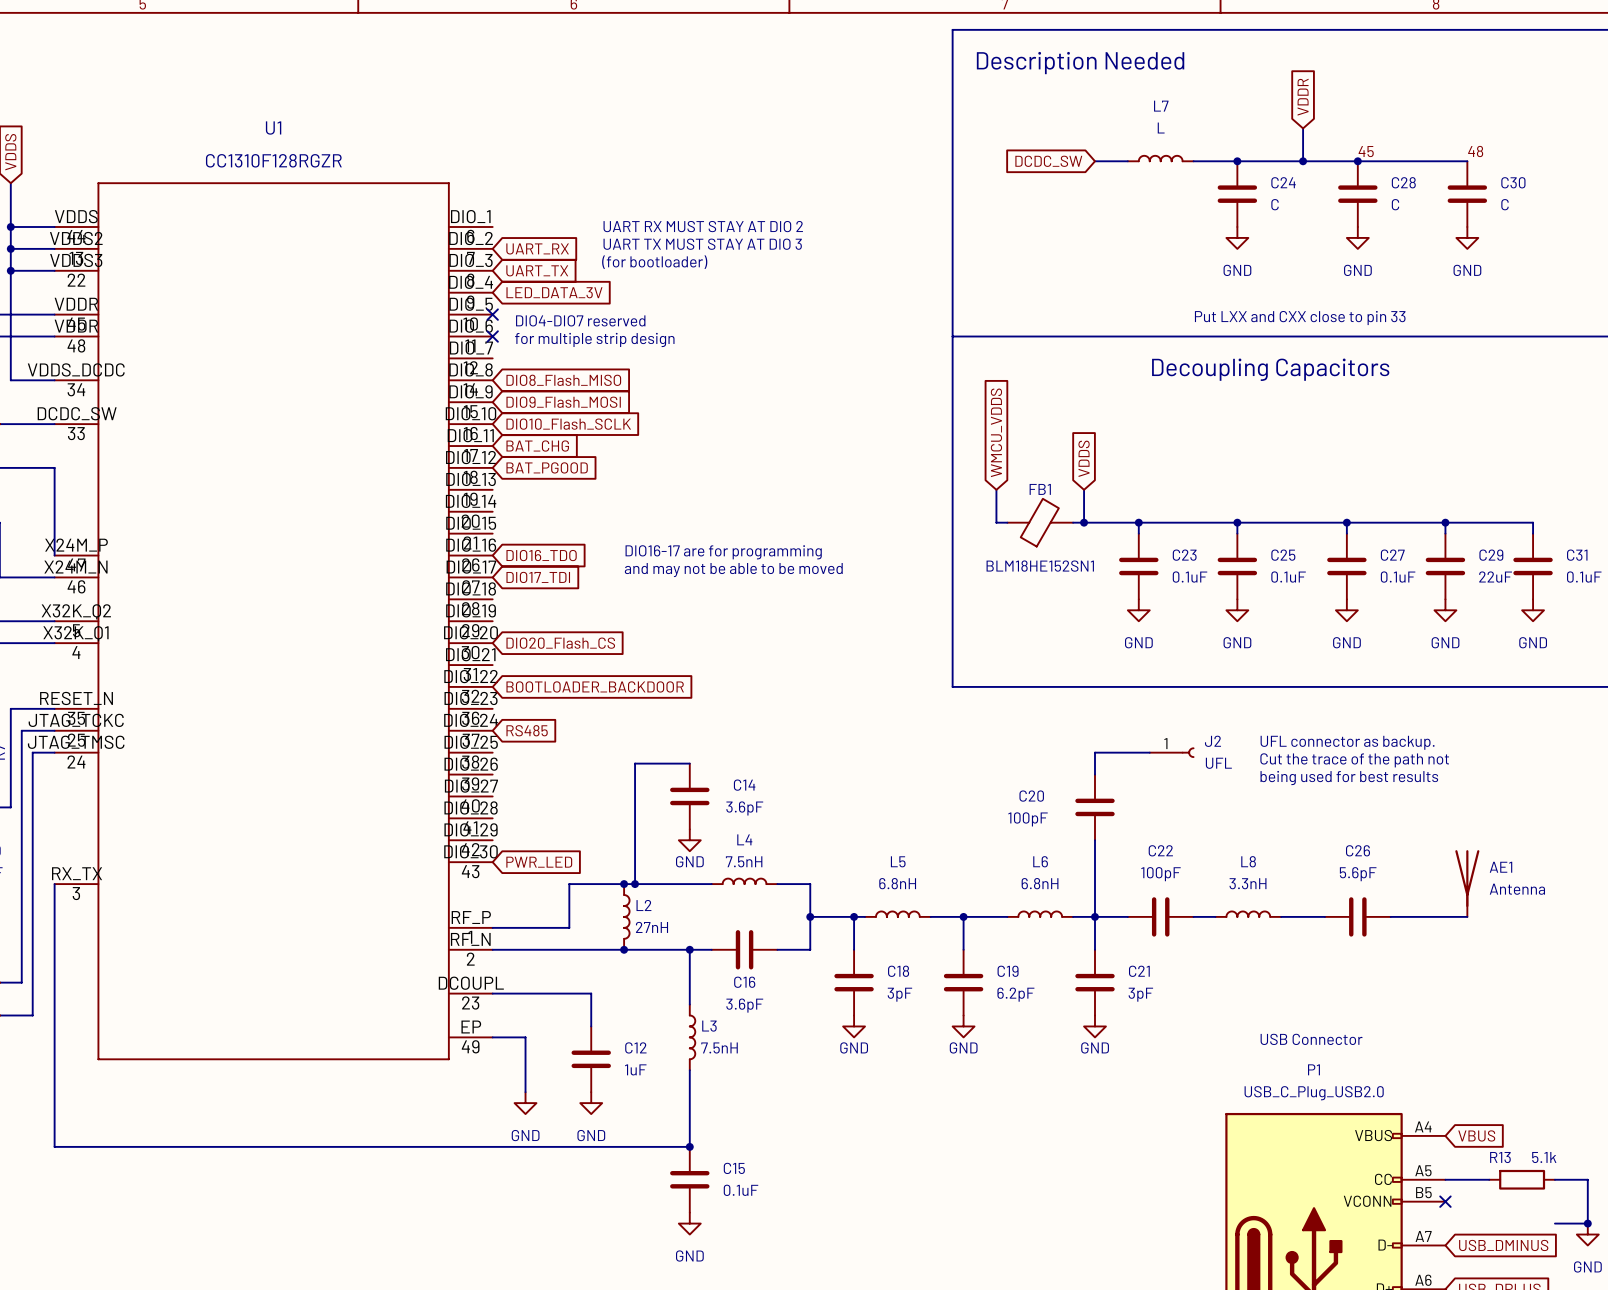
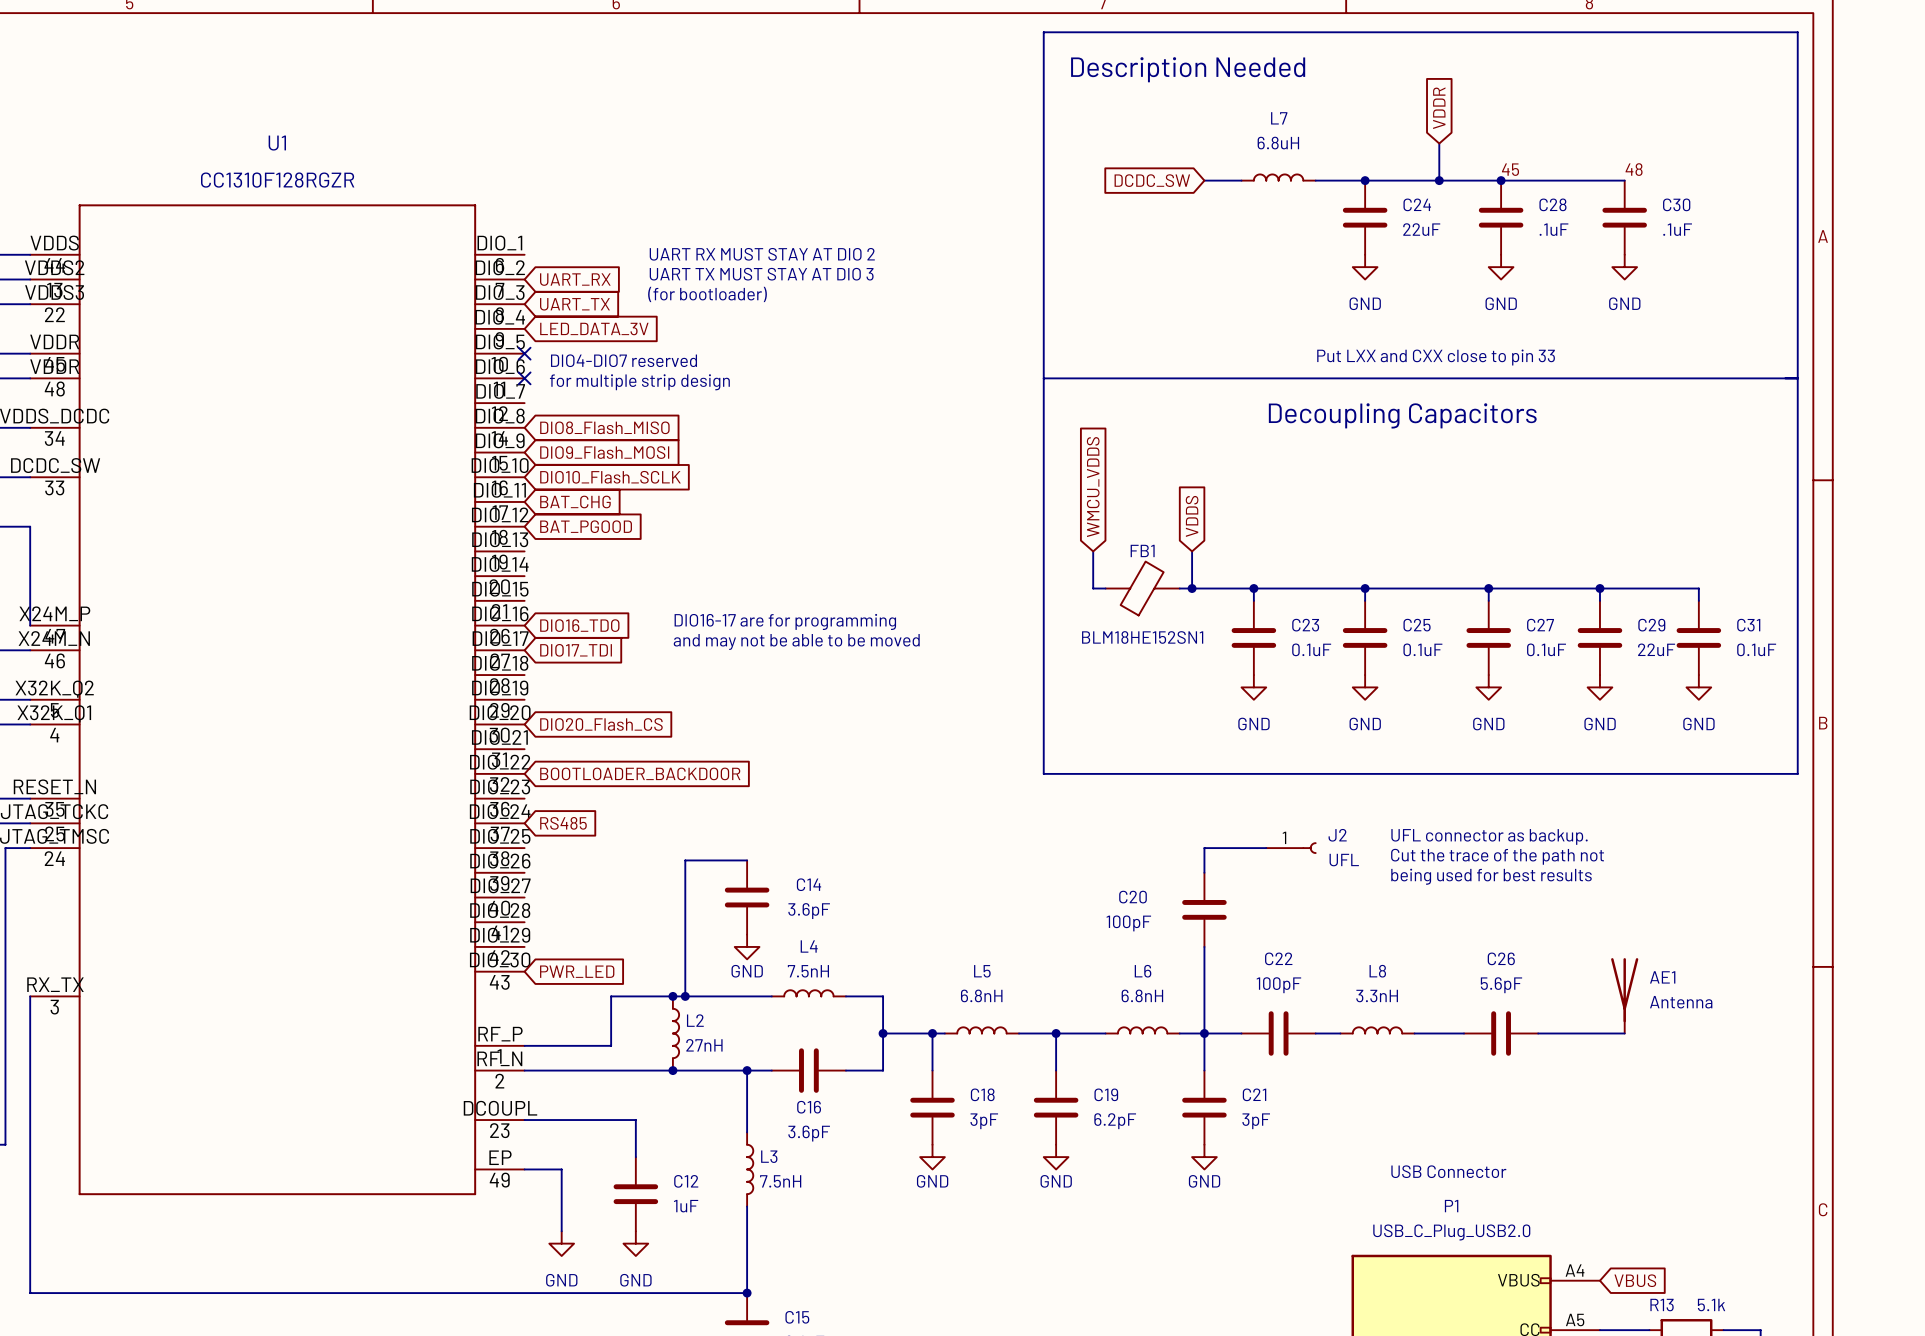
L7 value: L (1161, 128) -> 6.8uH (1278, 143)
C24 value: C (1275, 204) -> 22uF (1421, 229)
C28 value: C (1395, 204) -> .1uF (1553, 229)
C30 value: C (1505, 204) -> .1uF (1677, 229)

